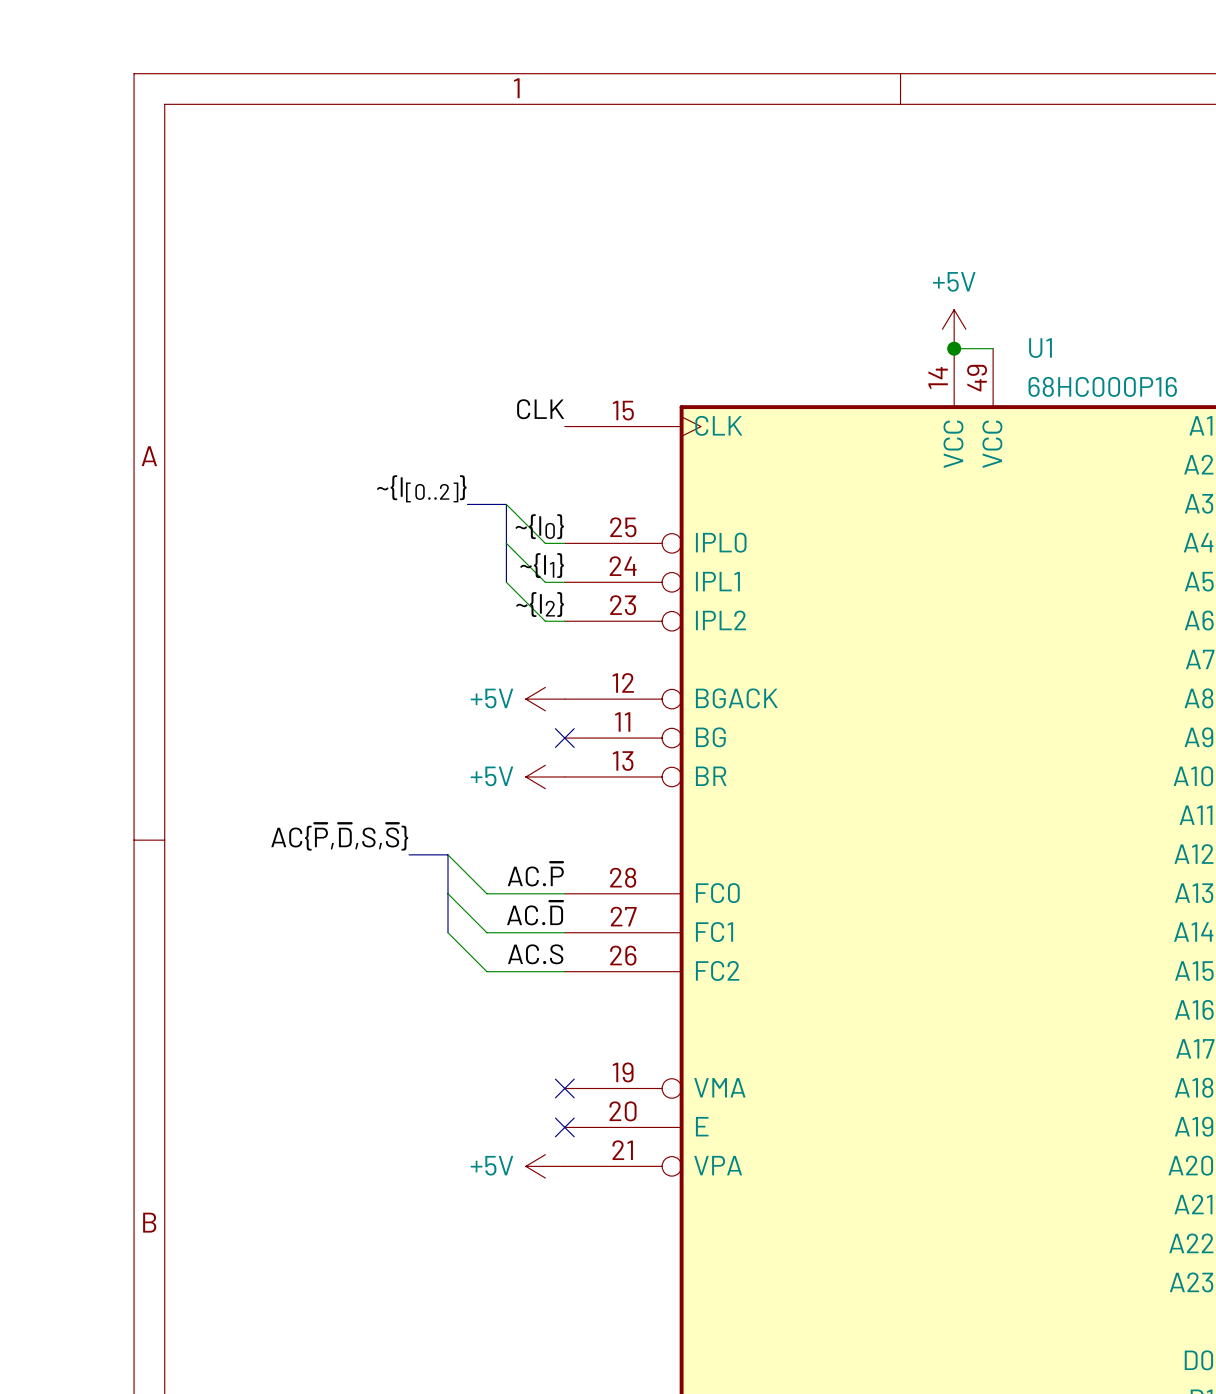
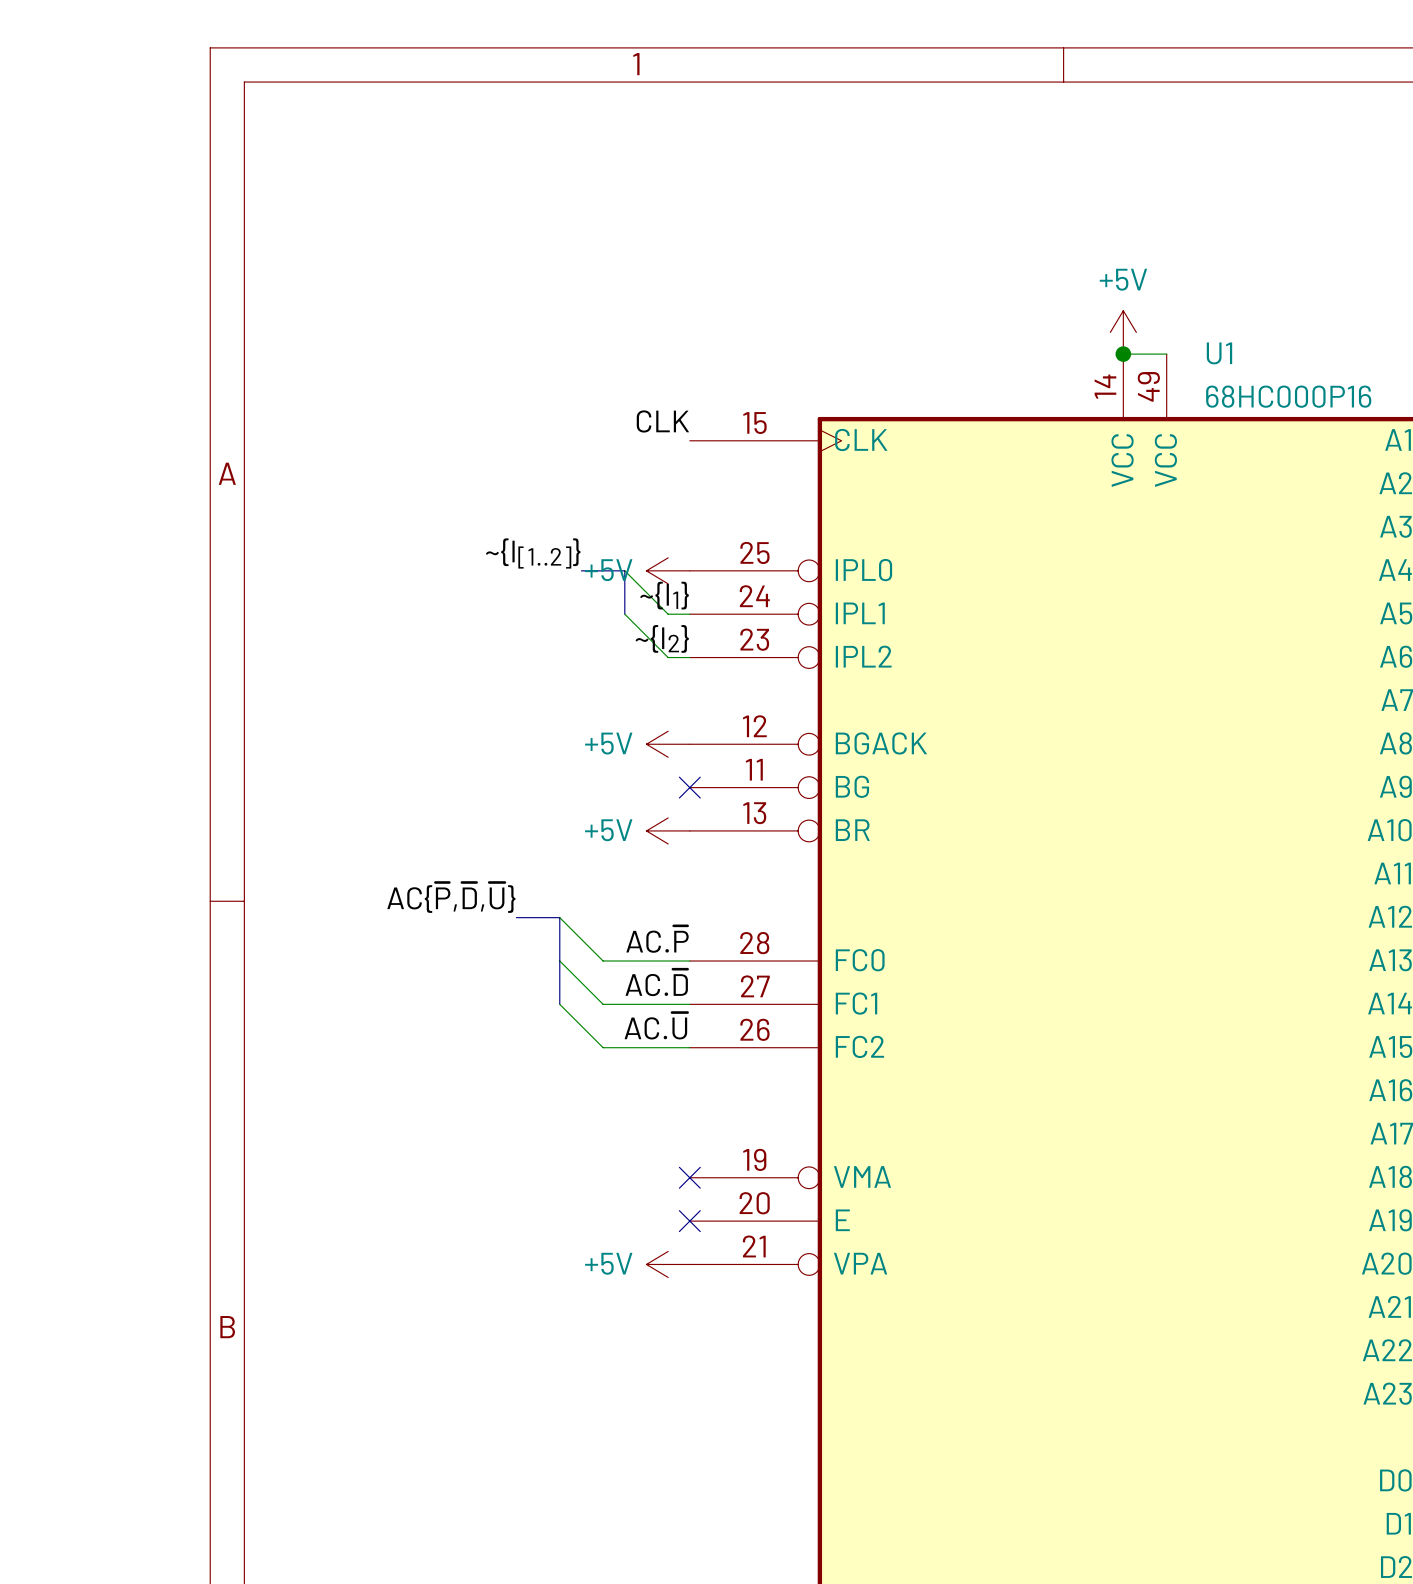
label: ~{I[0..2]} (421, 488) -> ~{I[1..2]} (533, 553)
bus: (467, 504) (506, 504) (506, 543) -> (581, 570) (624, 570)
wire: (506, 504) (545, 543) (564, 543) -> none
label: ~{I0} (539, 526) -> none
power symbol: none -> +5V (668, 570)
label: AC{~{P},~{D},S,~{S}} (339, 836) -> AC{~{P},~{D},~{U}} (451, 897)
label: AC.S (535, 954) -> AC.~{U} (656, 1026)

